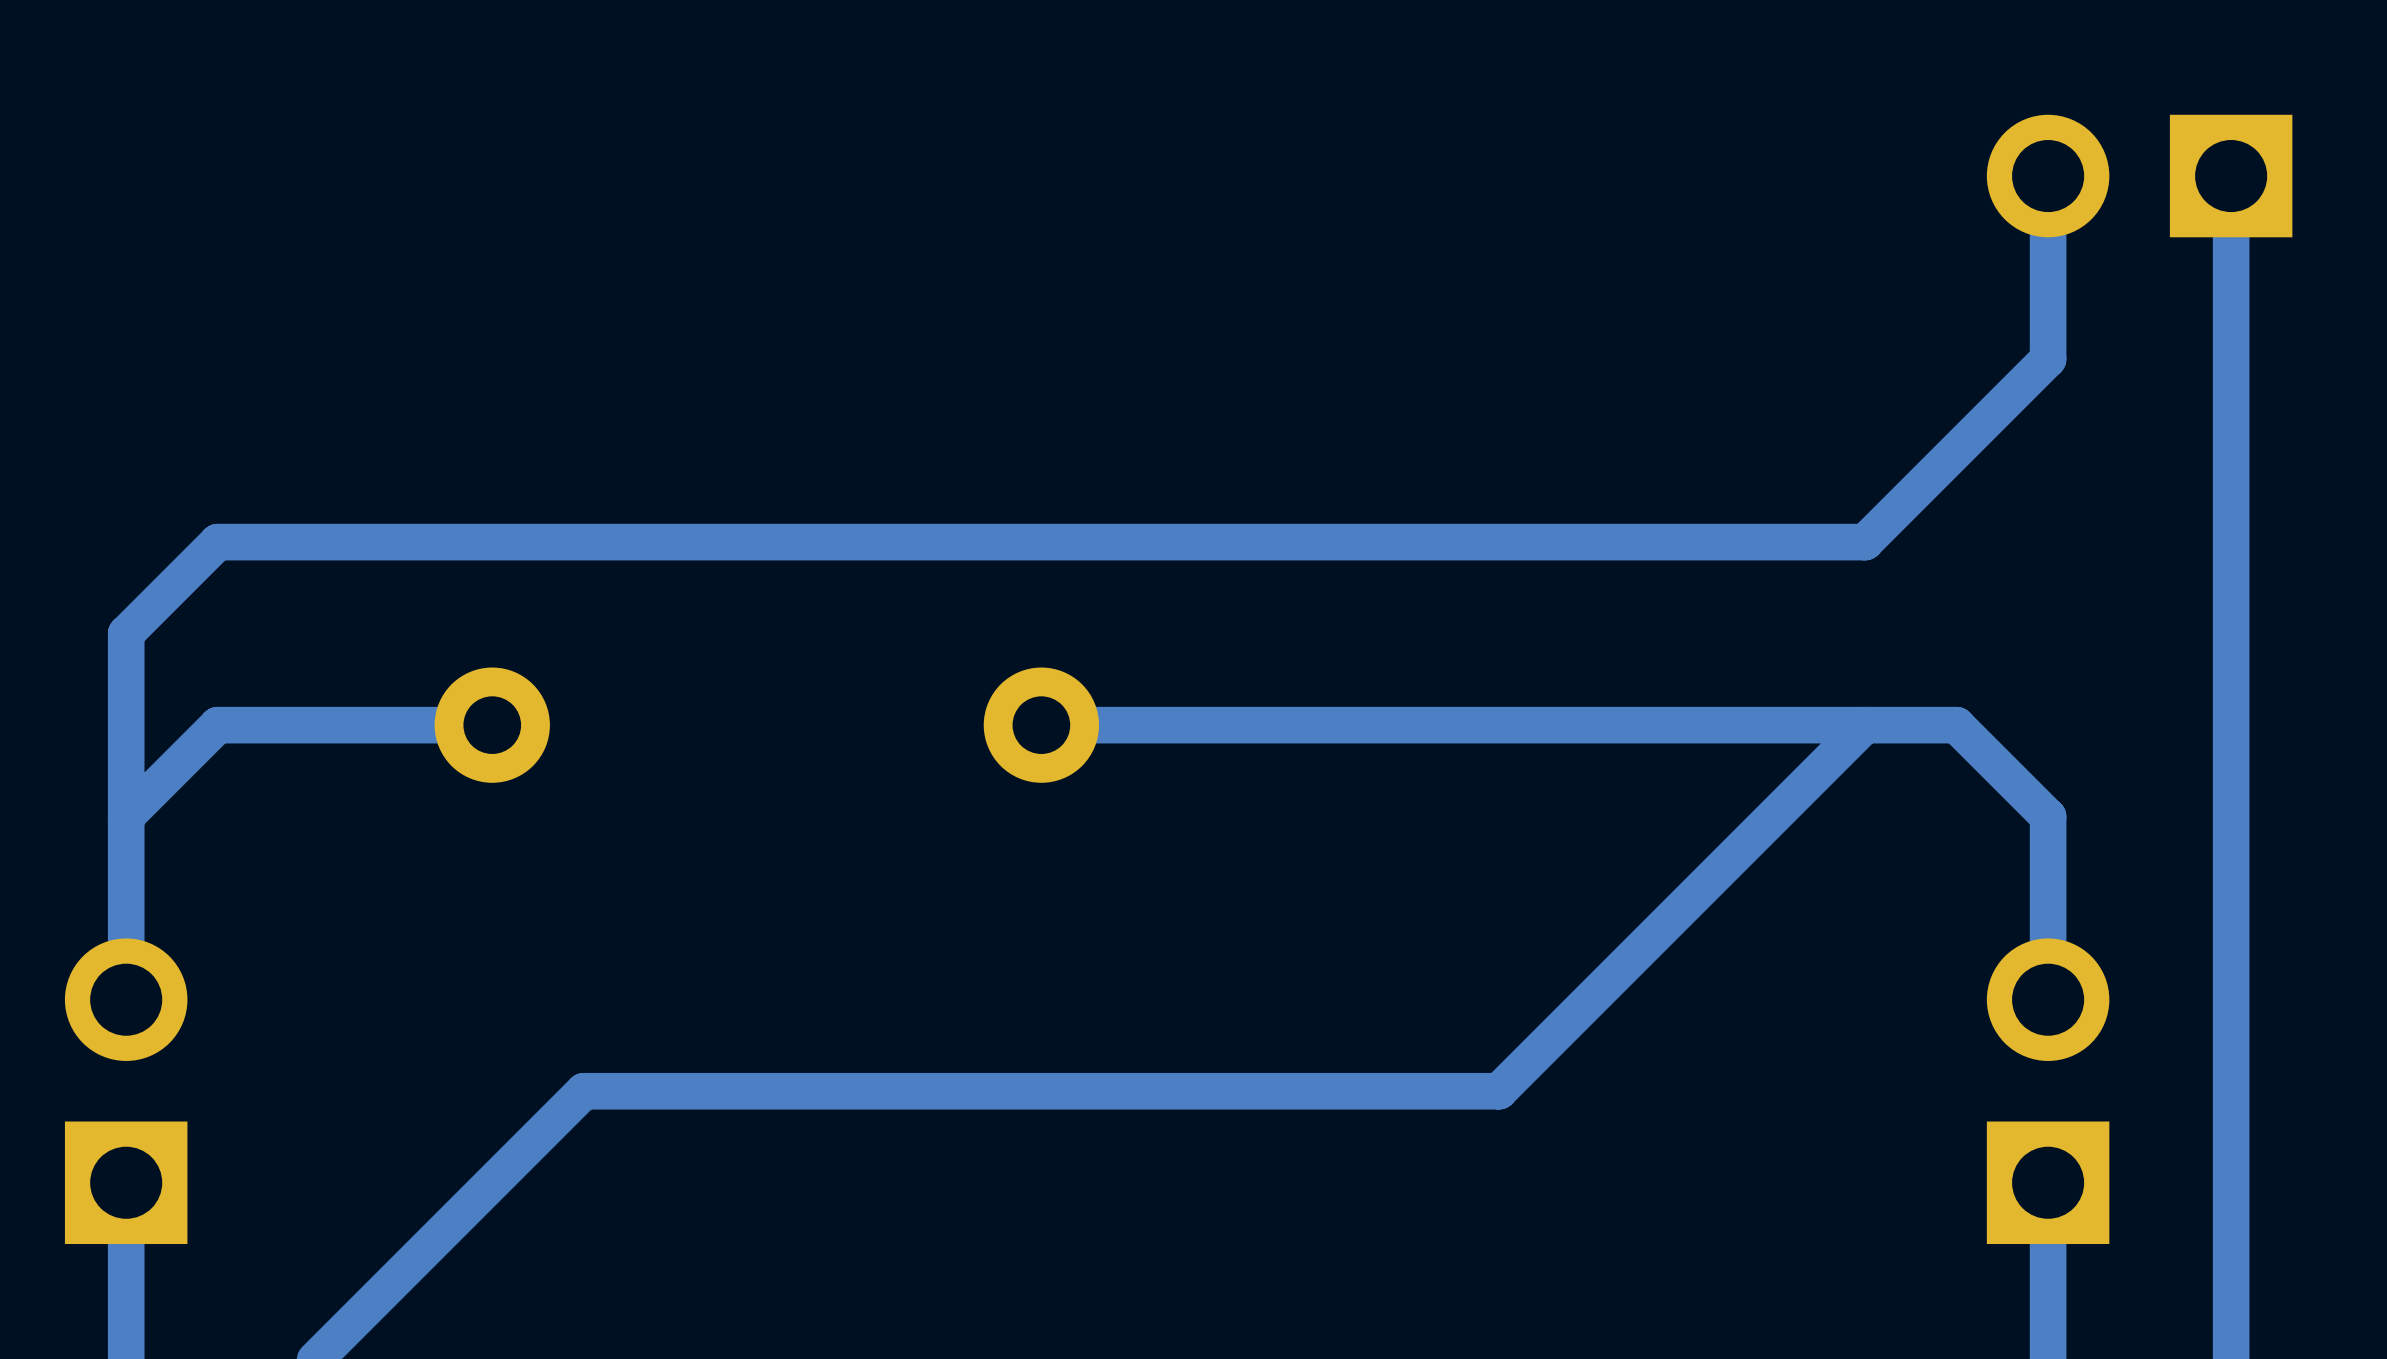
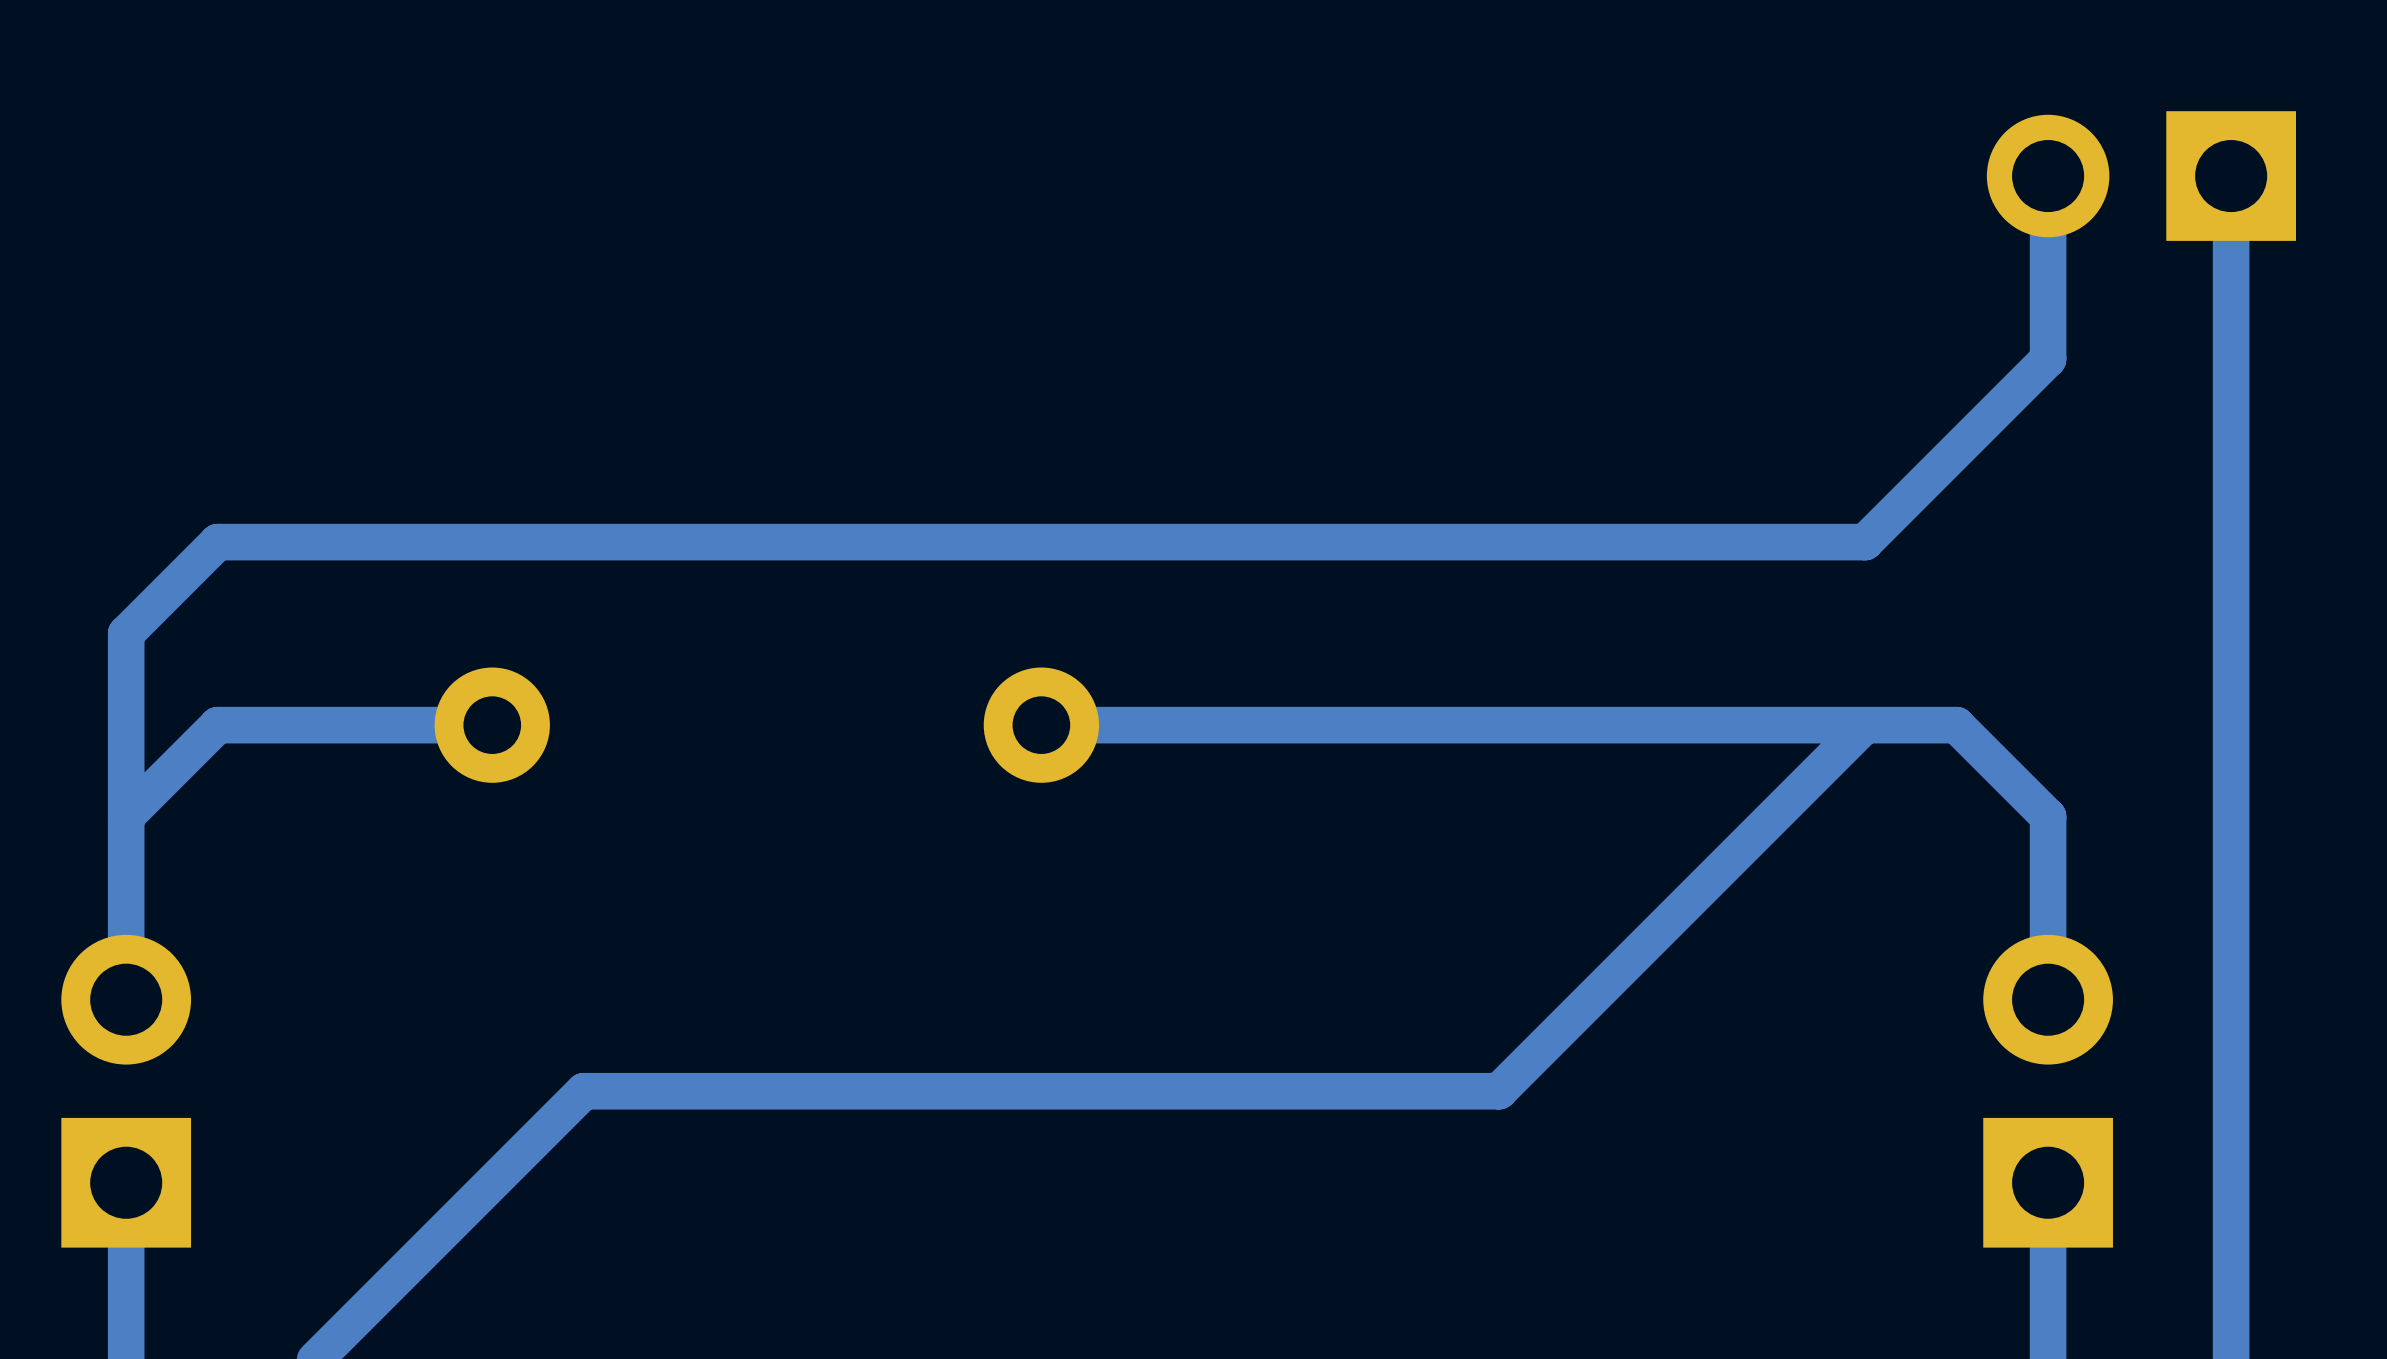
part footprint: [2169, 114, 2293, 238] -> [2166, 111, 2297, 241]
part footprint: [64, 938, 188, 1245] -> [61, 934, 192, 1248]
part footprint: [1986, 938, 2110, 1245] -> [1983, 934, 2113, 1248]

